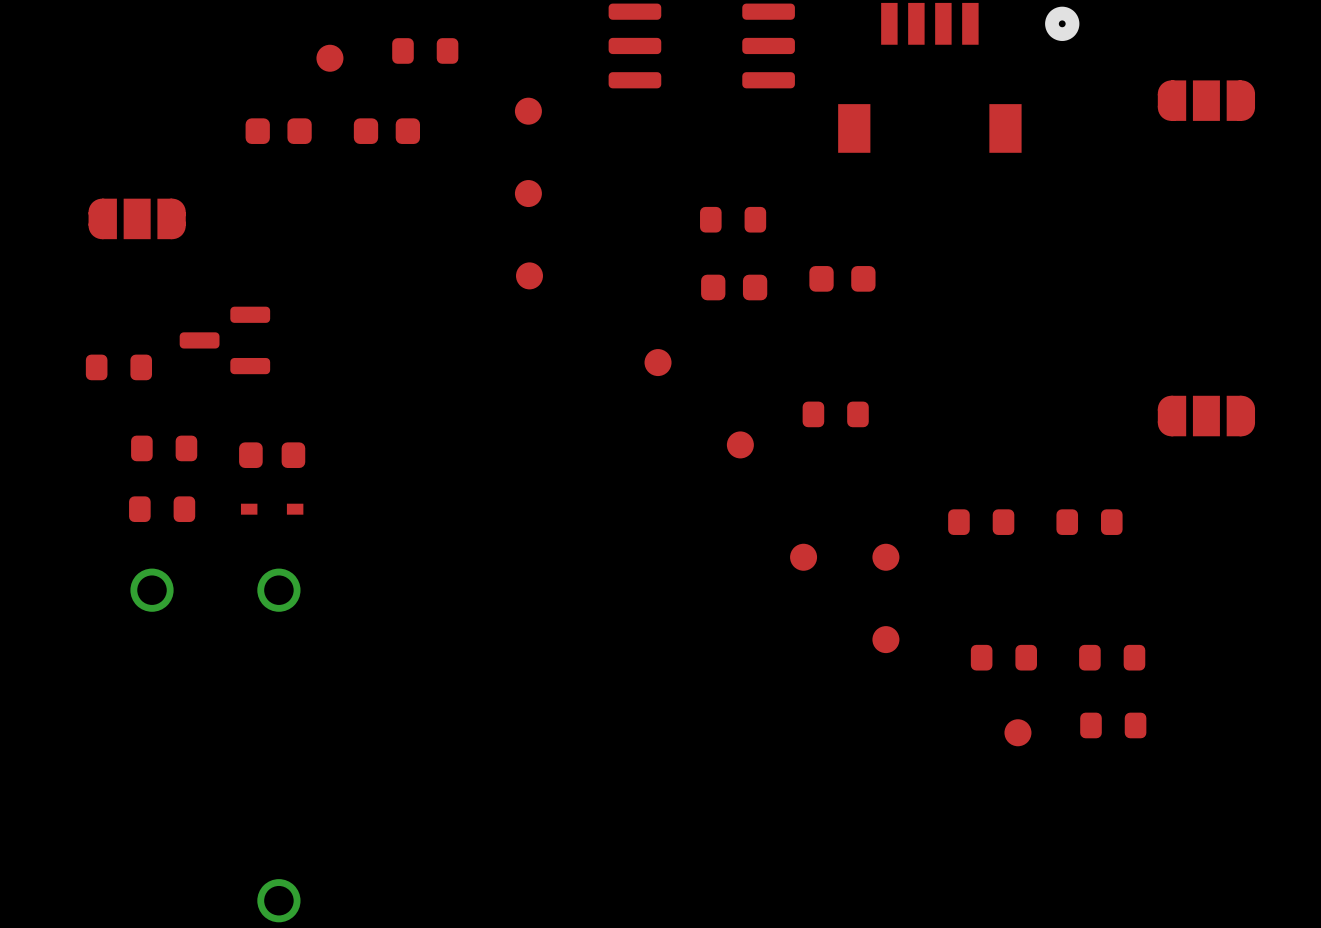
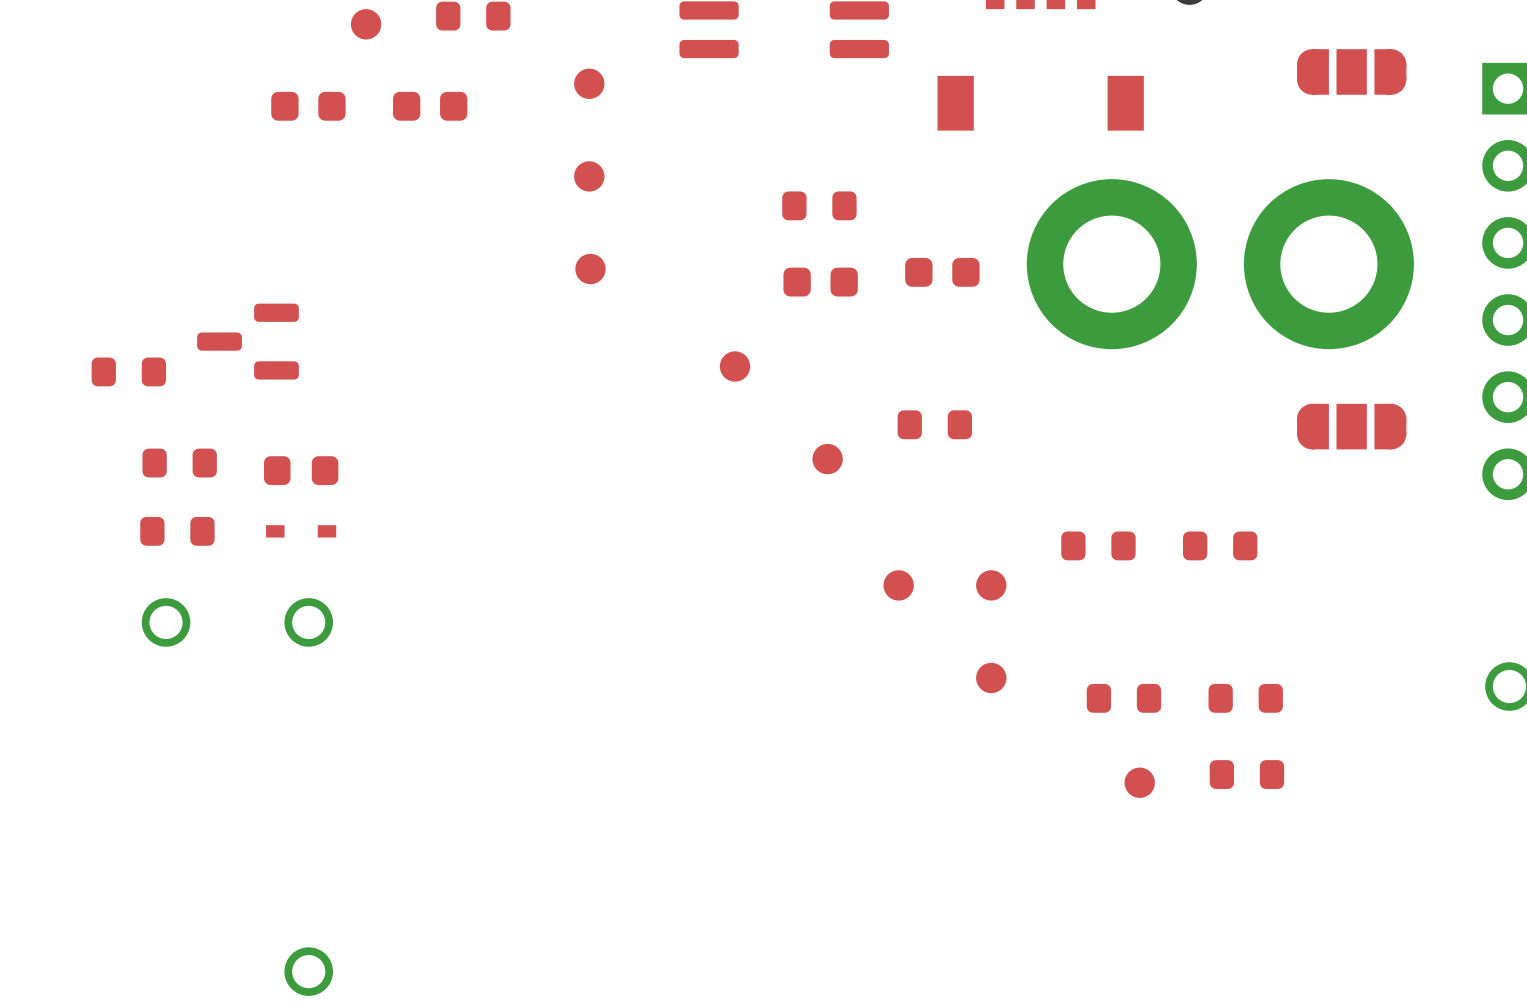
part: (137, 218) -> none
part: none -> (1111, 264)
part: none -> (1328, 264)

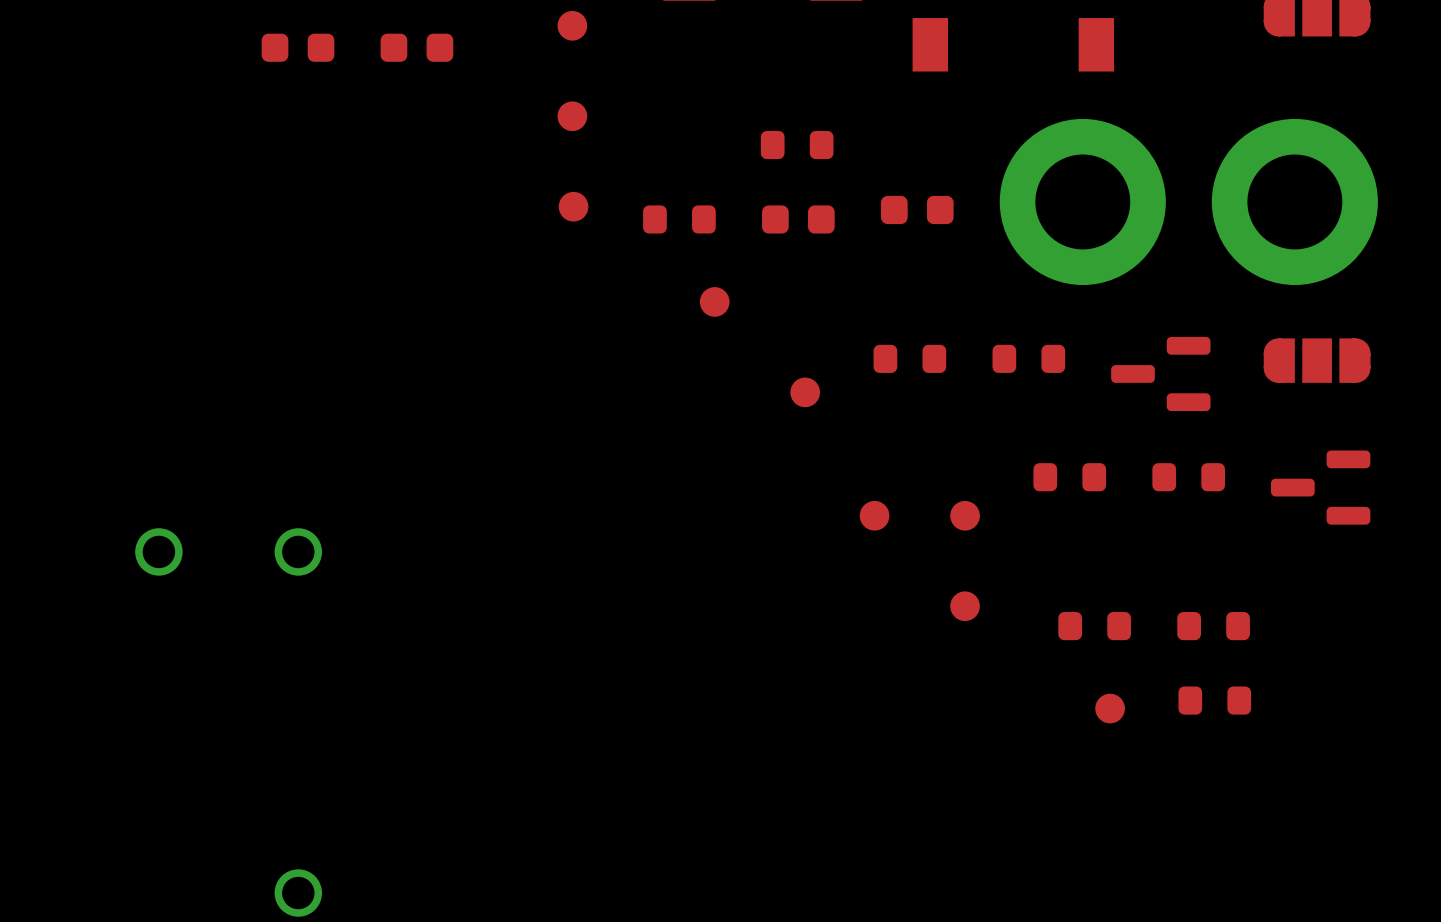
part: none -> (679, 219)
part: (248, 341) -> none
part: (128, 371) -> none
part: none -> (1028, 358)
part: none -> (1160, 373)
part: (179, 463) -> none
part: (301, 470) -> none
part: (177, 531) -> none
part: (301, 531) -> none
part: none -> (1320, 487)

